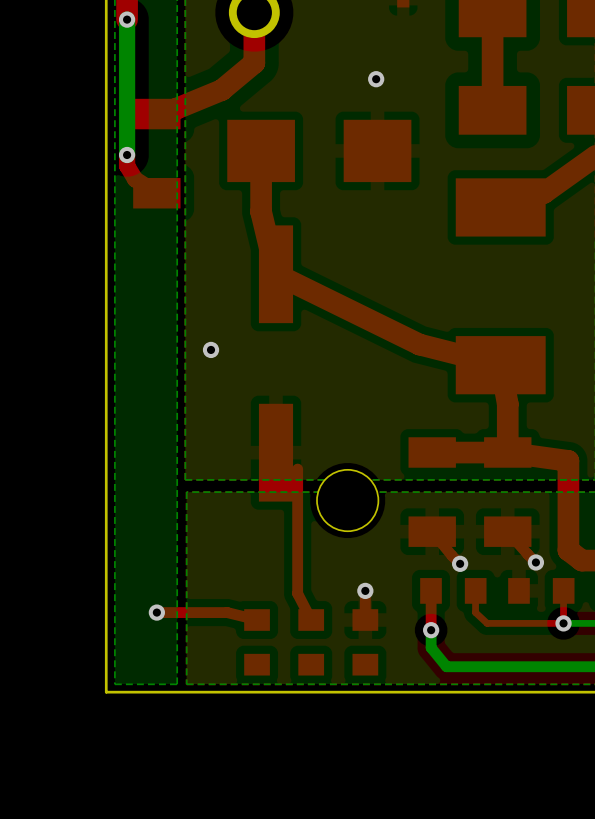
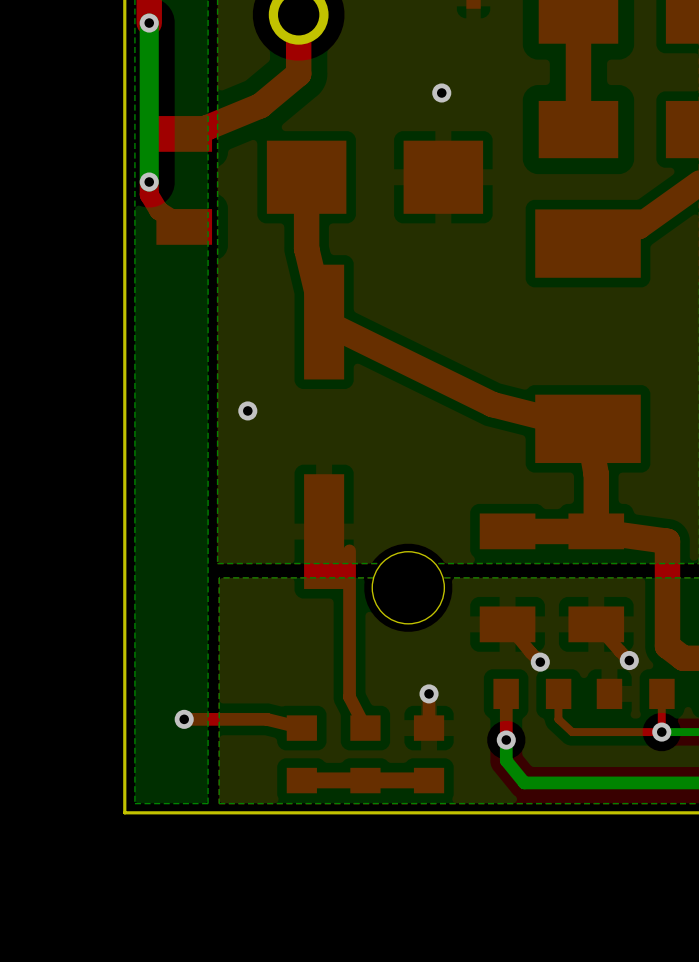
top track: none -> (429, 780) (301, 780)

